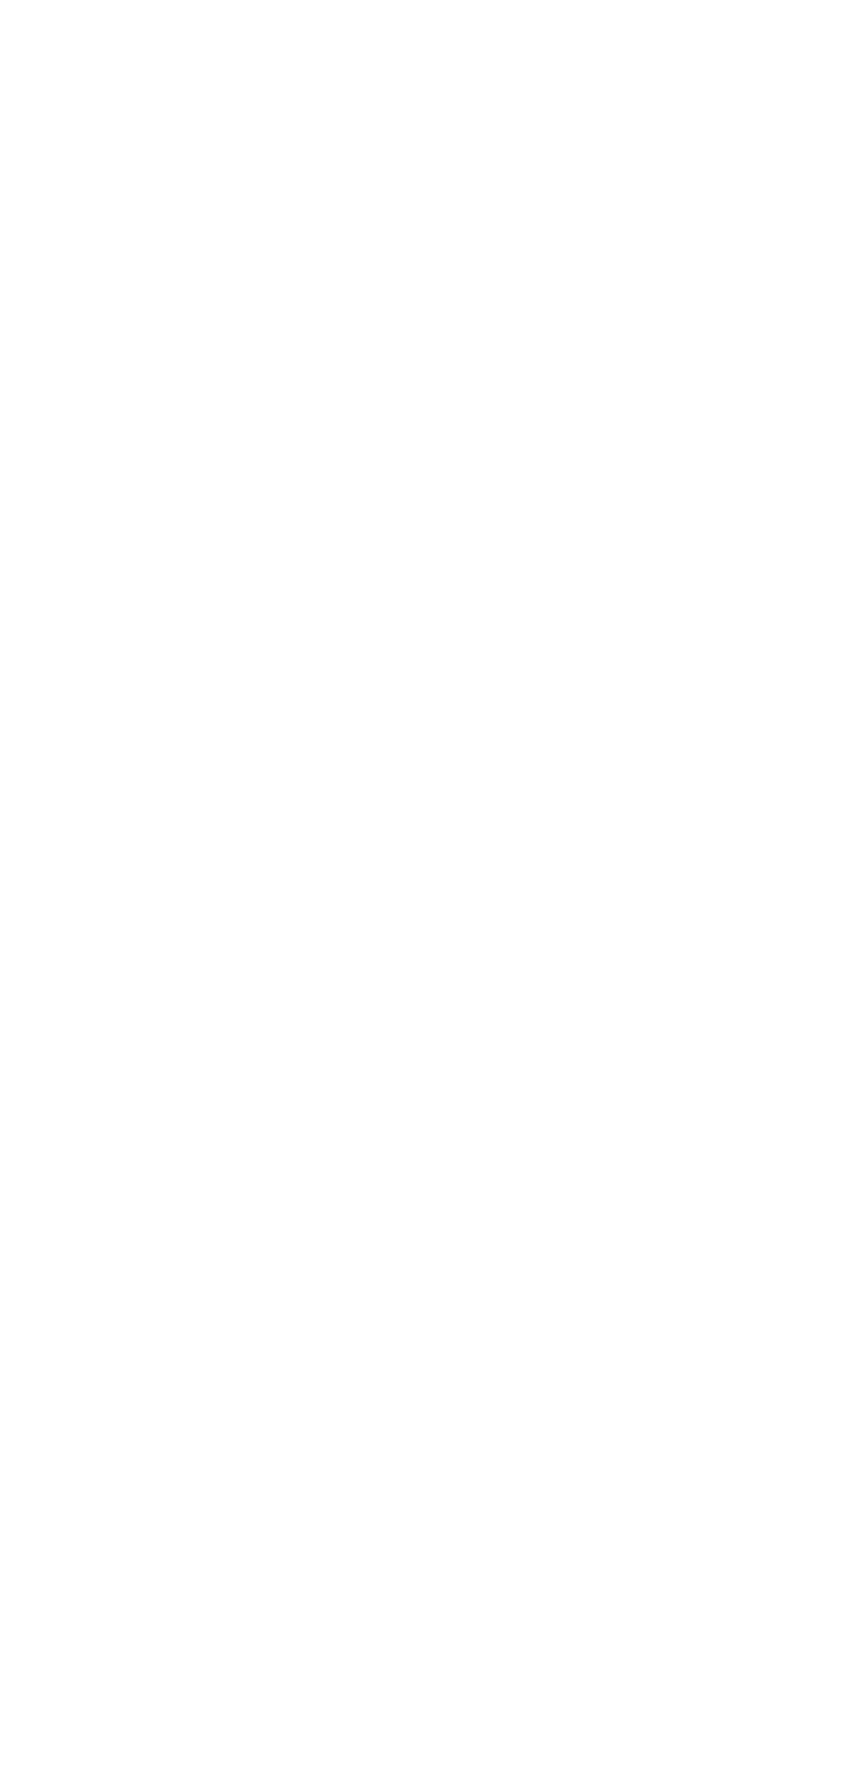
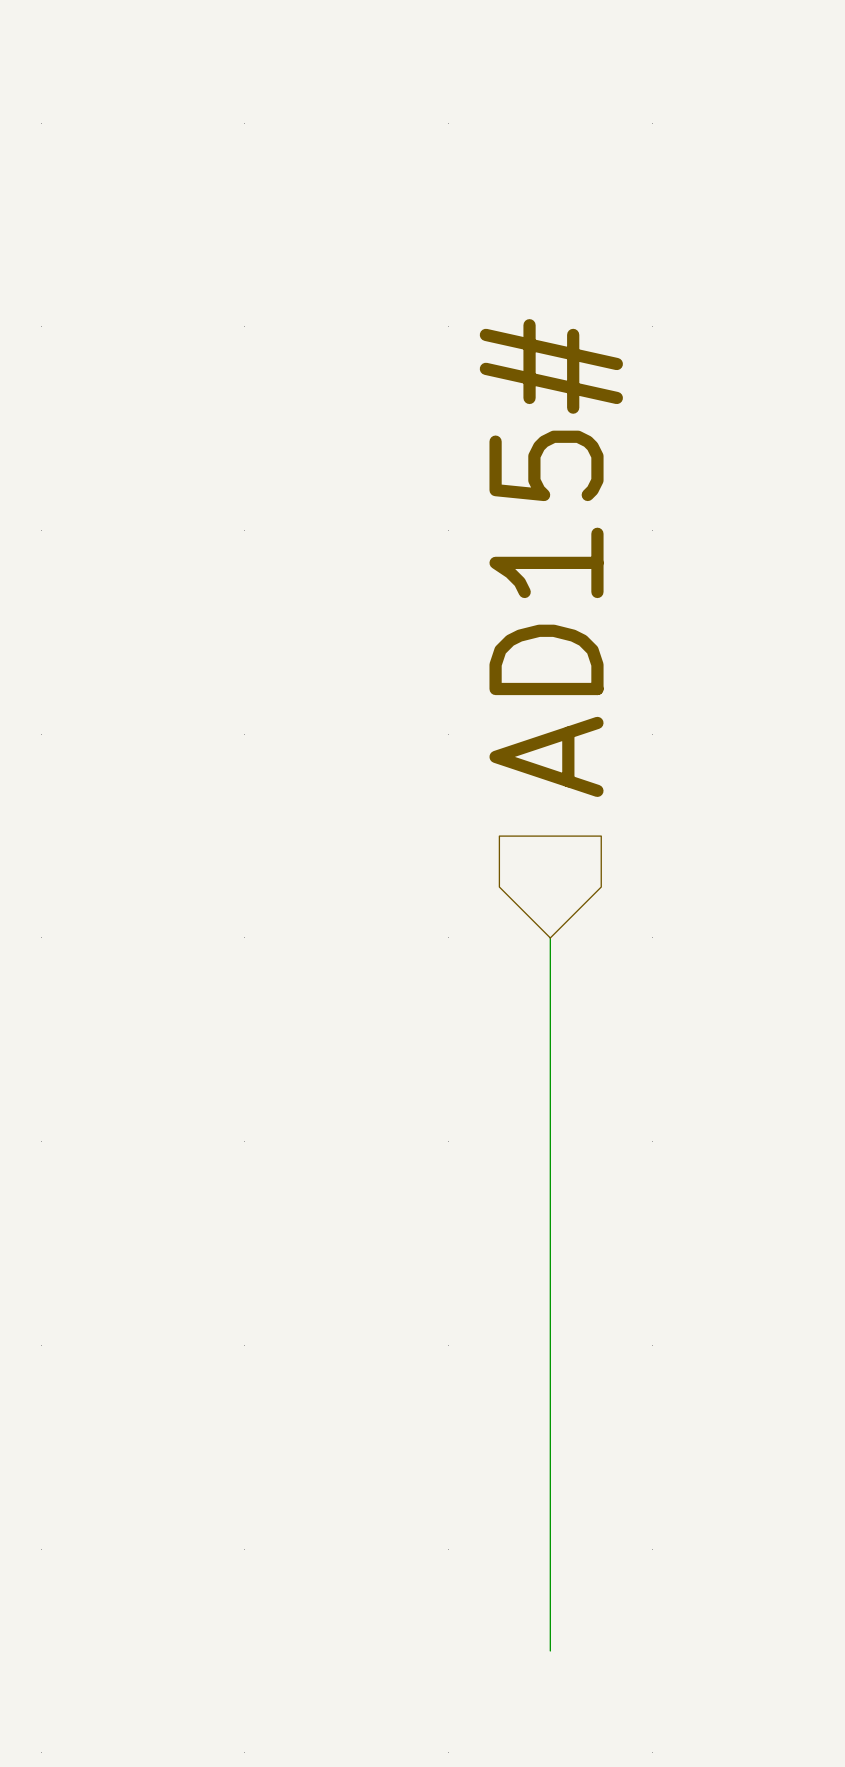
hierarchical label: none -> AD15# (551, 558)
wire: none -> (550, 937) (550, 1650)

